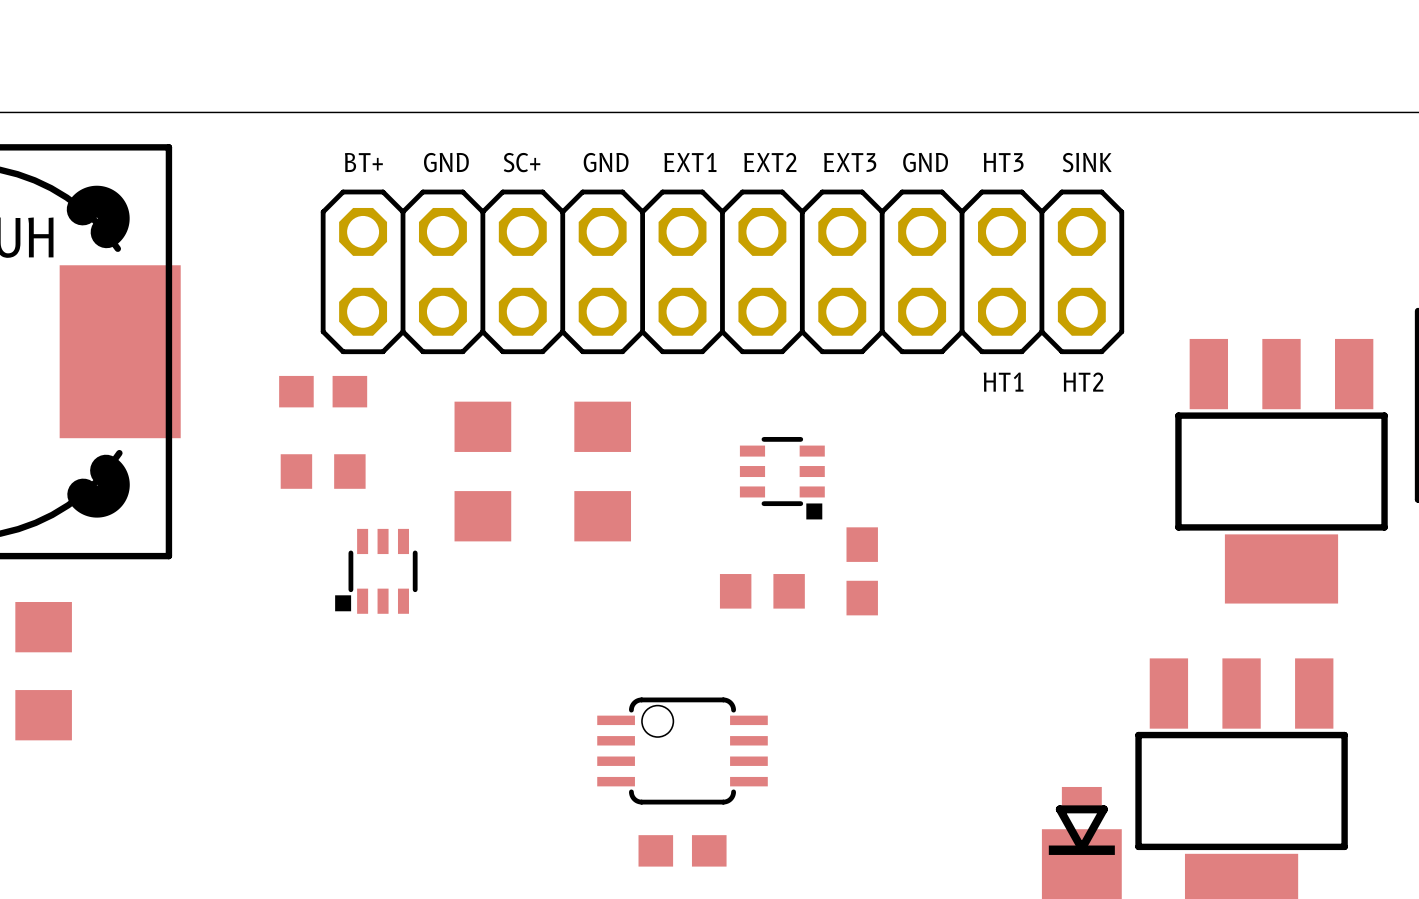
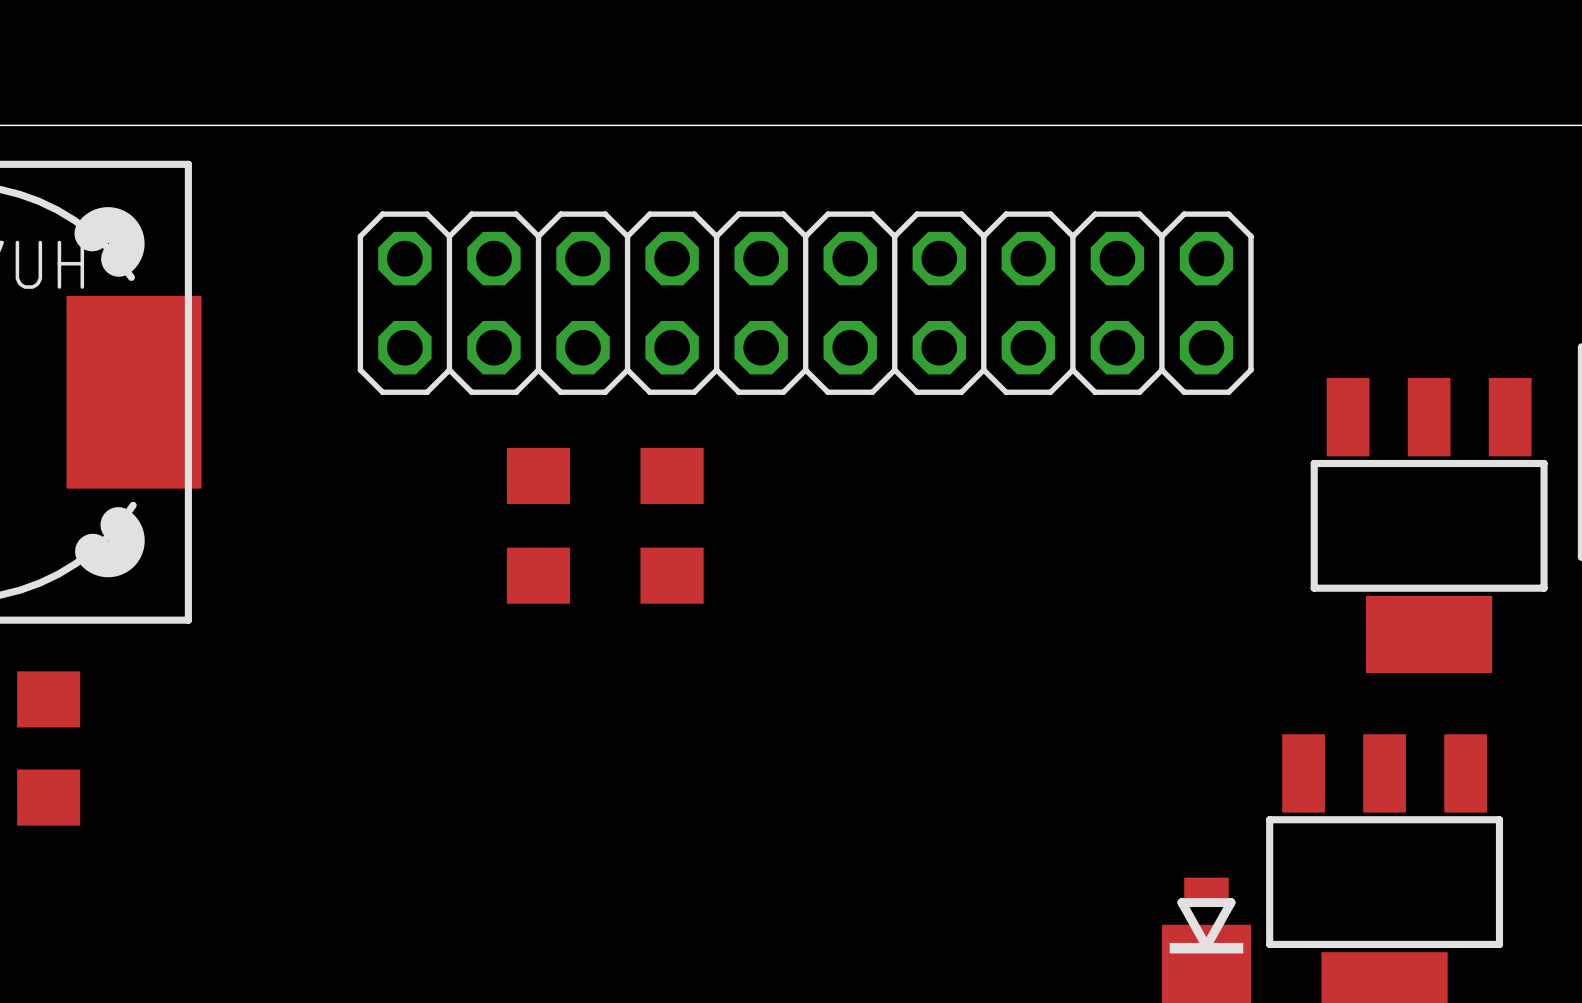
text: BT+ (363, 162) -> none
text: GND (446, 162) -> none
text: SC+ (522, 162) -> none
text: GND (606, 162) -> none
text: EXT1 (690, 162) -> none
text: EXT2 (770, 162) -> none
text: EXT3 (850, 162) -> none
text: GND (925, 162) -> none
text: HT3 (1003, 162) -> none
text: SINK (1087, 162) -> none
text: HT1 (1003, 382) -> none
text: HT2 (1083, 382) -> none
part: (323, 391) -> none
part: (323, 471) -> none
part: (782, 478) -> none
part: (376, 571) -> none
part: (862, 571) -> none
part: (762, 591) -> none
part: (682, 751) -> none
part: (682, 850) -> none

